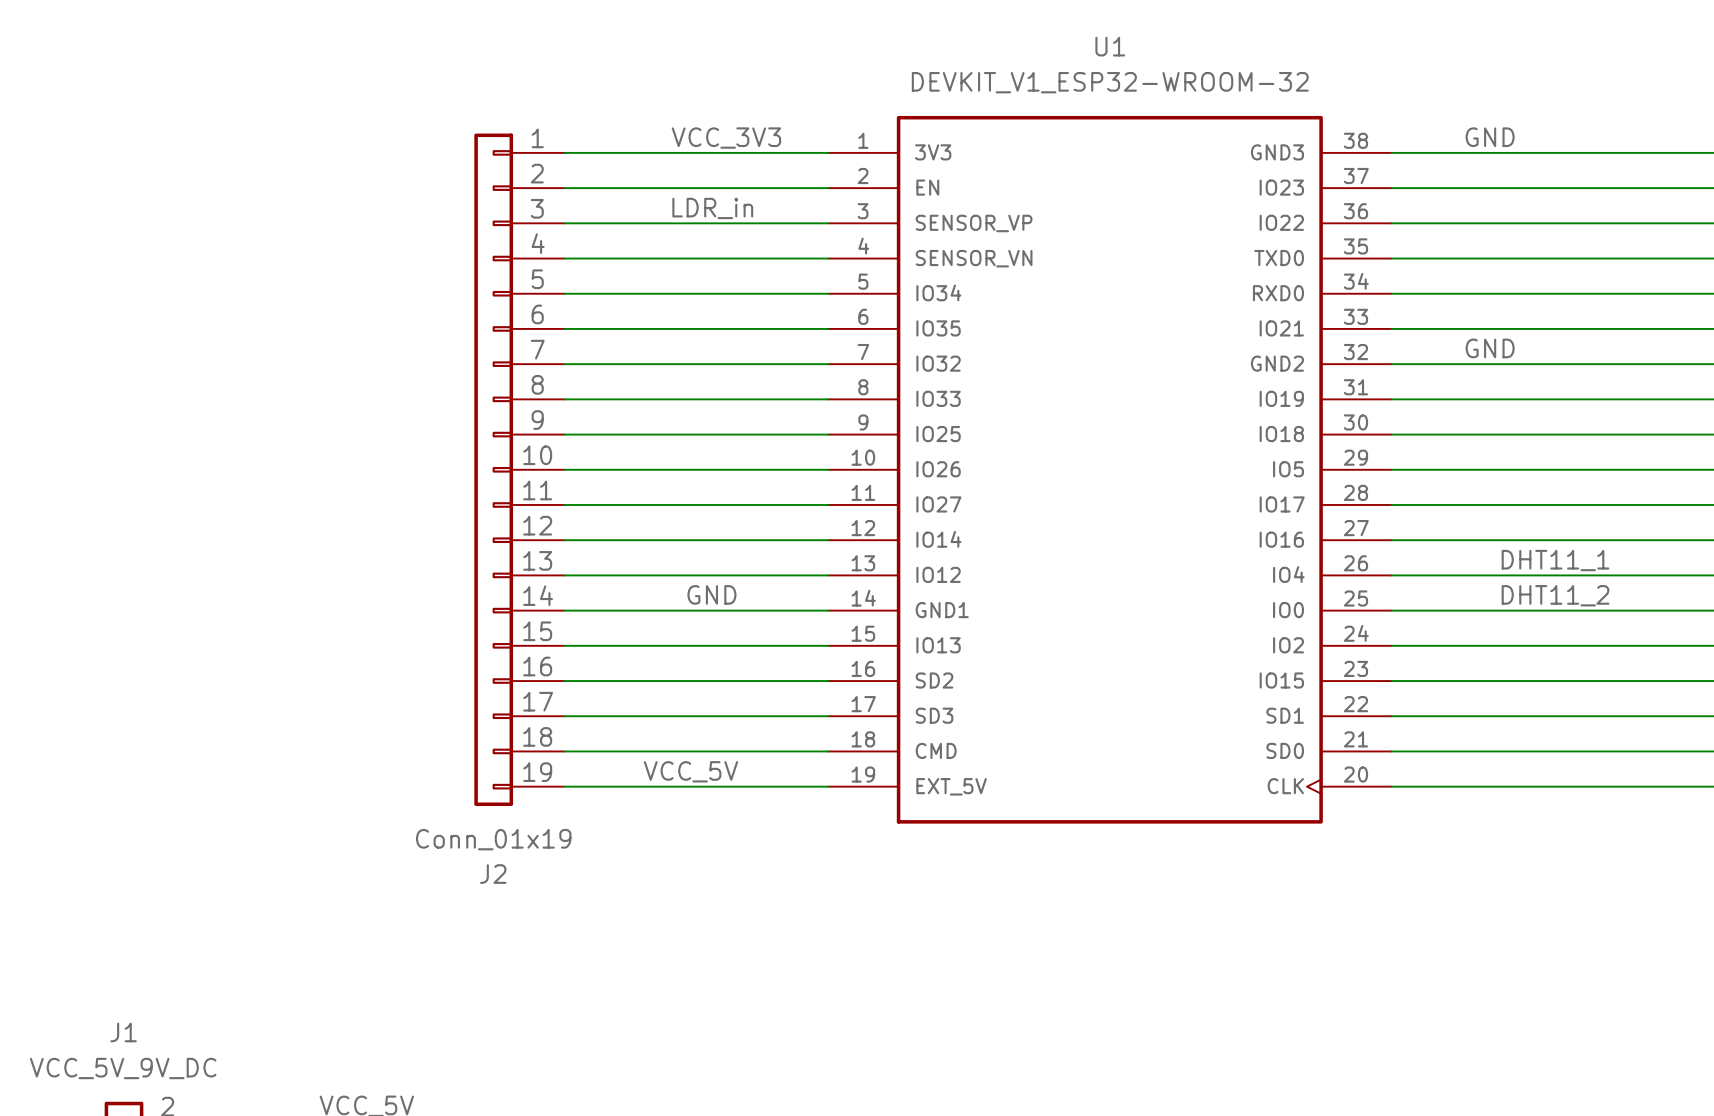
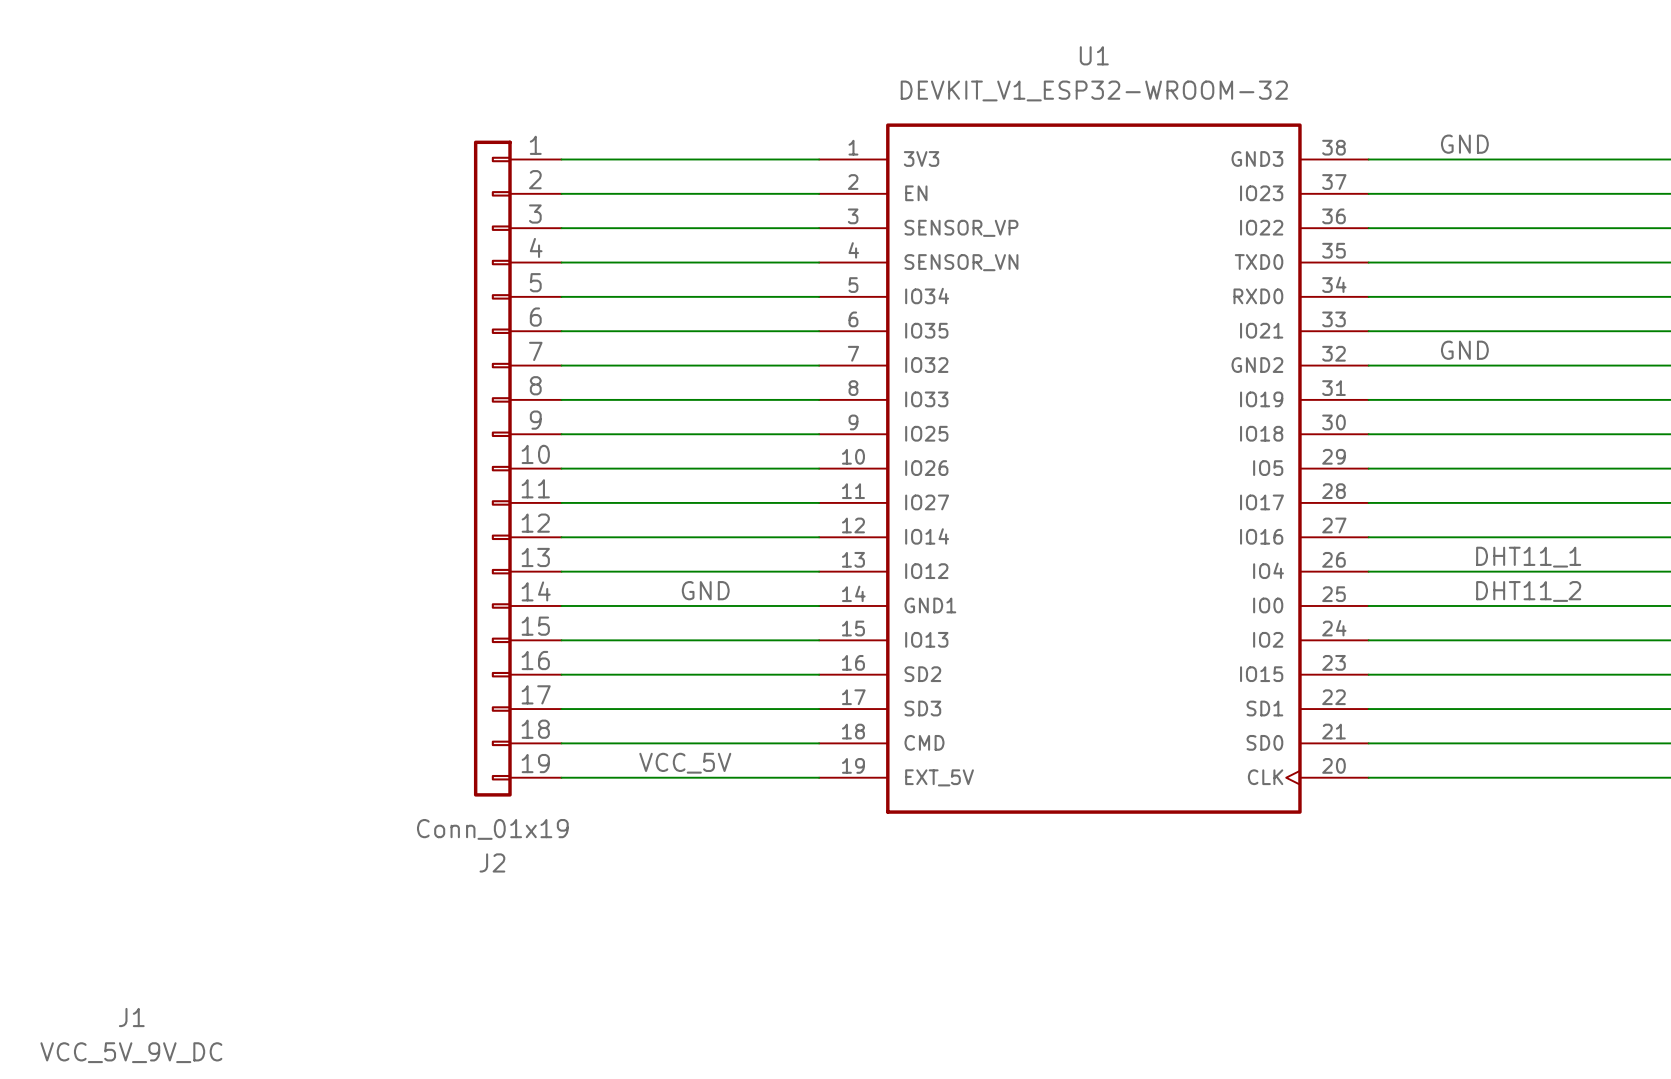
label: VCC_3V3 (726, 138) -> none
label: LDR_in (712, 208) -> none

